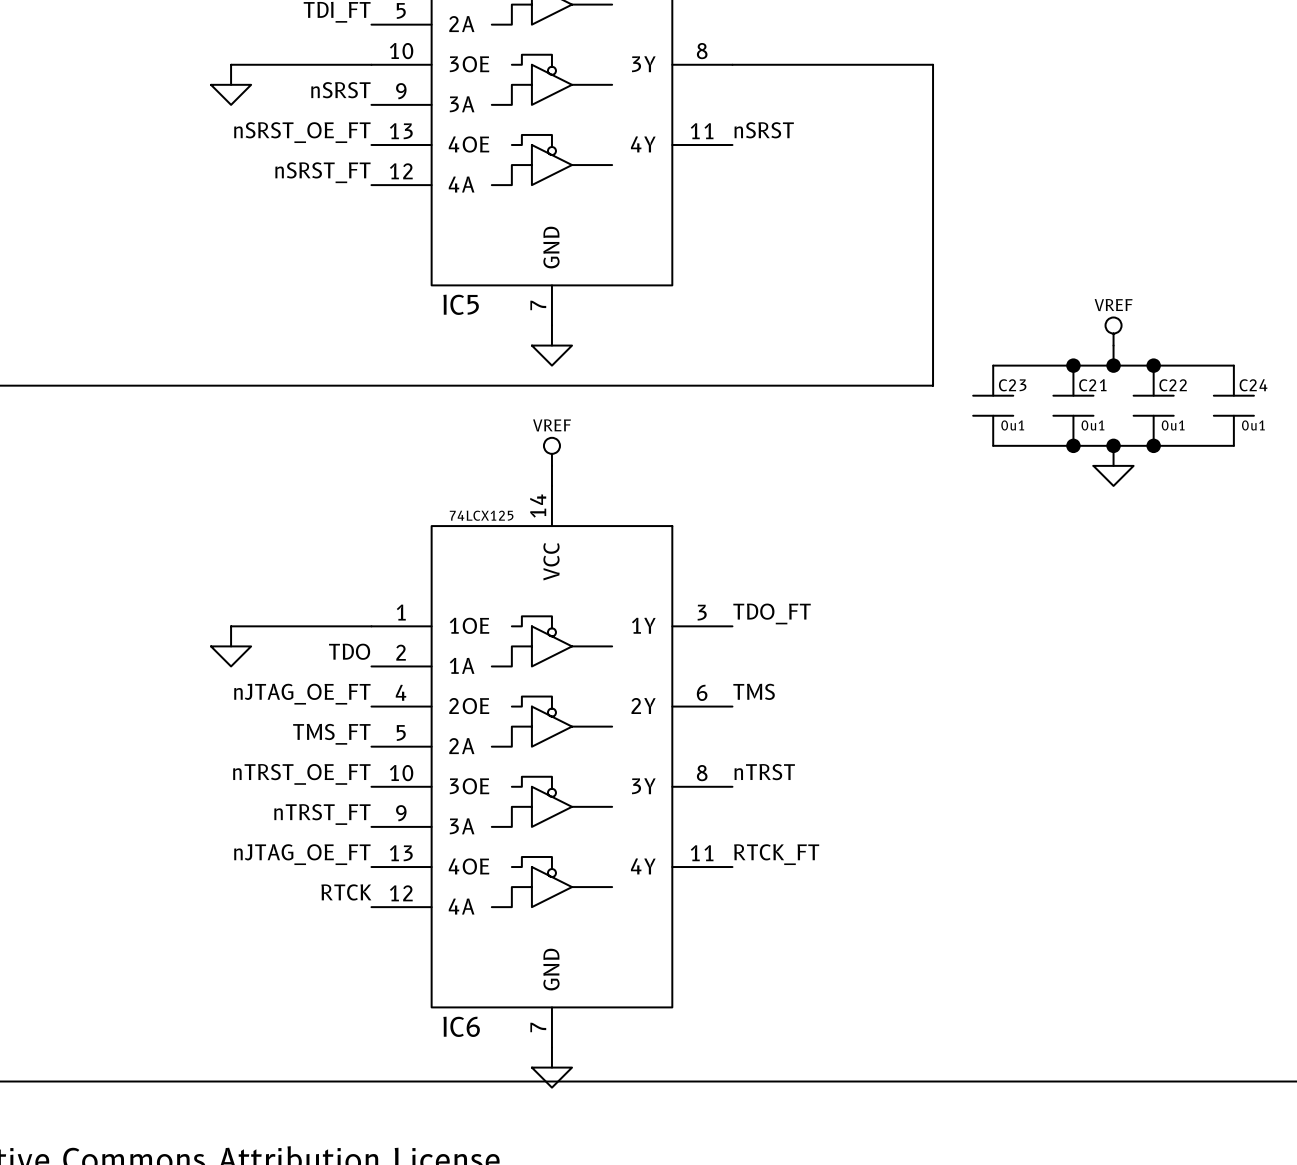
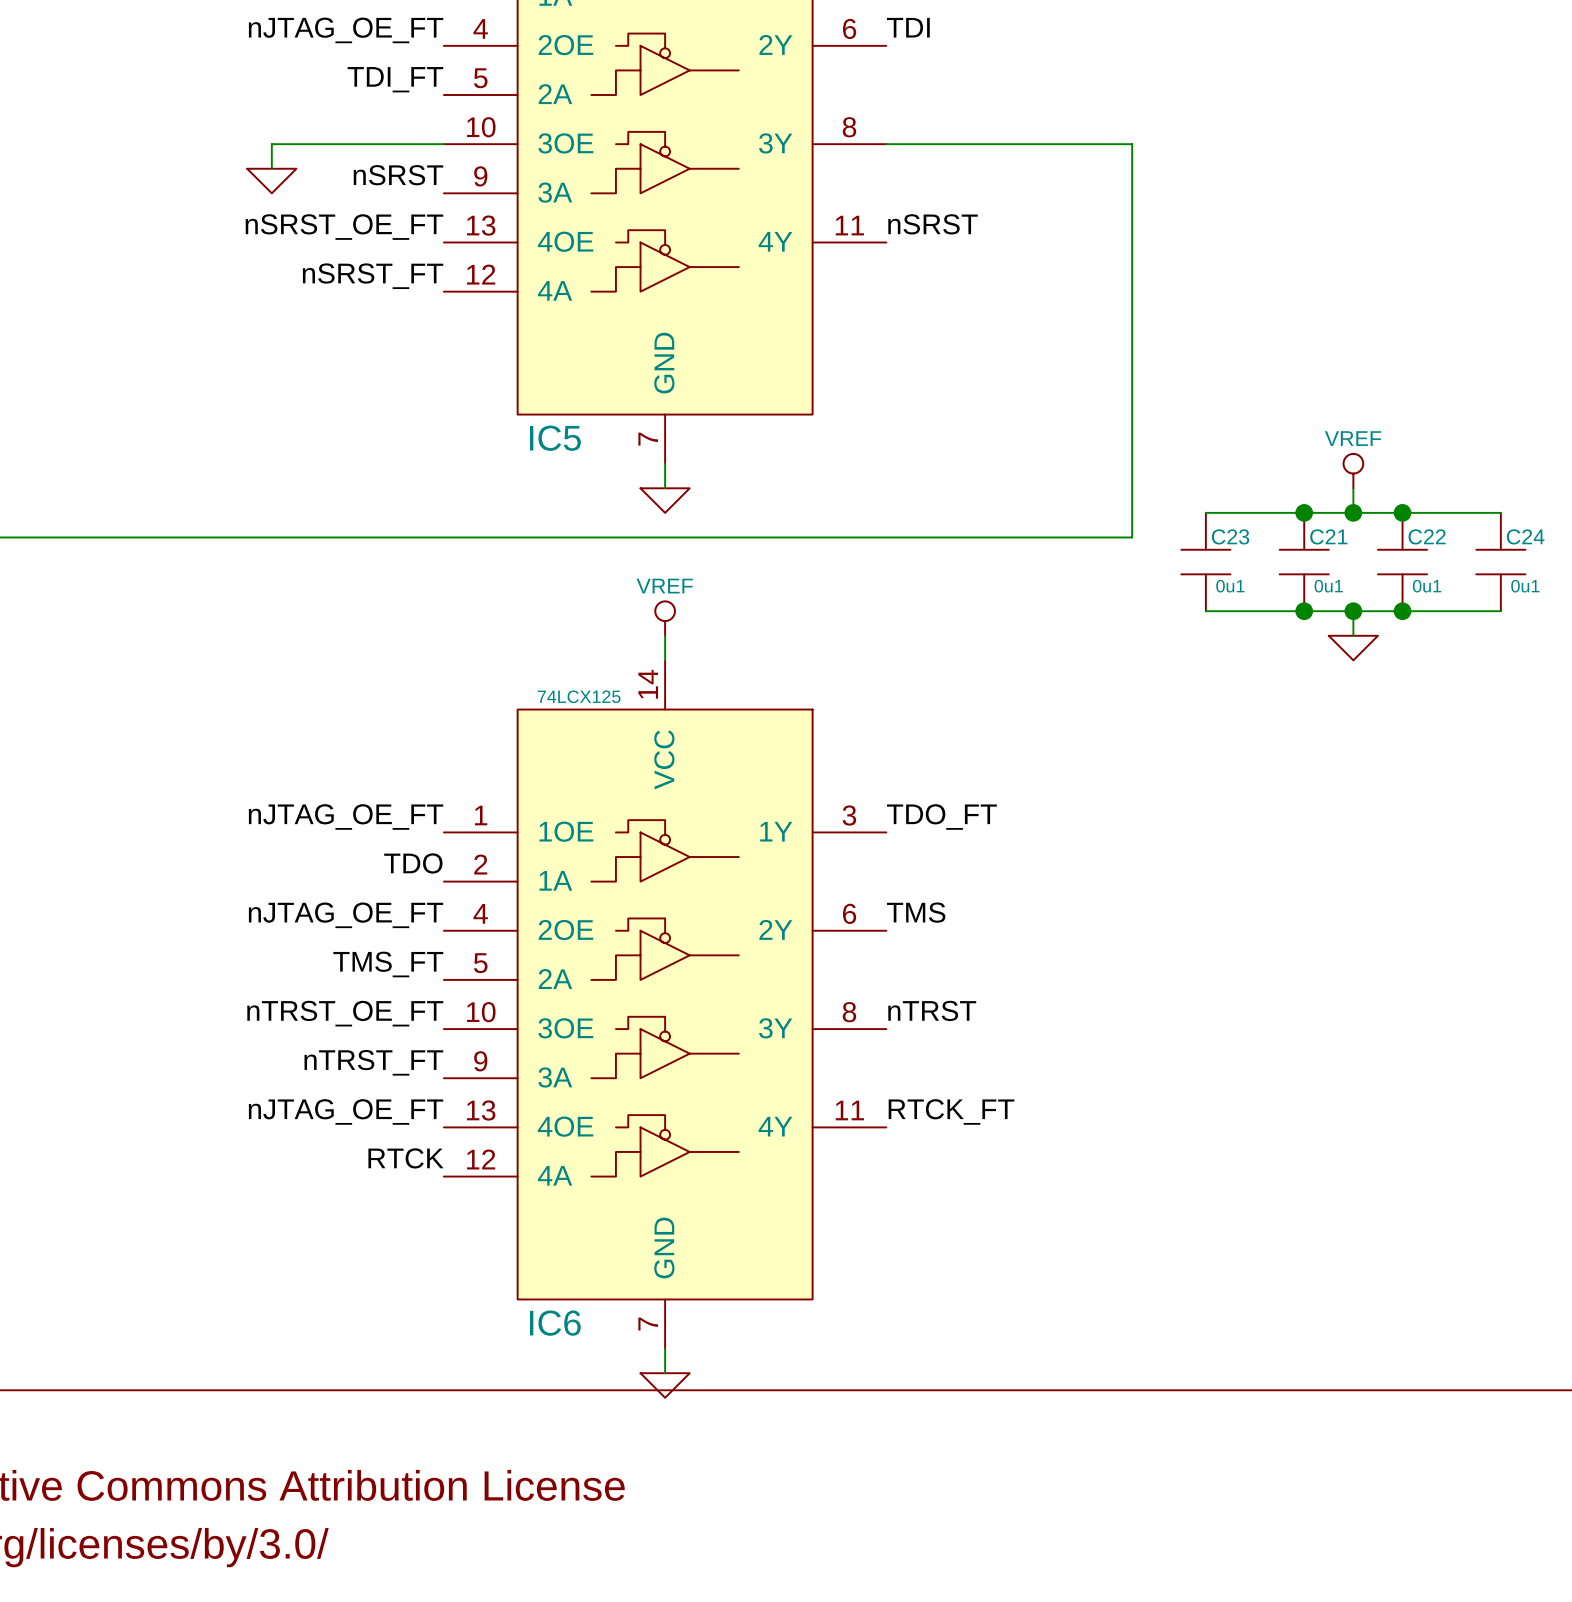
label: none -> nJTAG_OE_FT (346, 816)
wire: (371, 626) (231, 626) (231, 646) -> none
power symbol: (231, 656) -> none

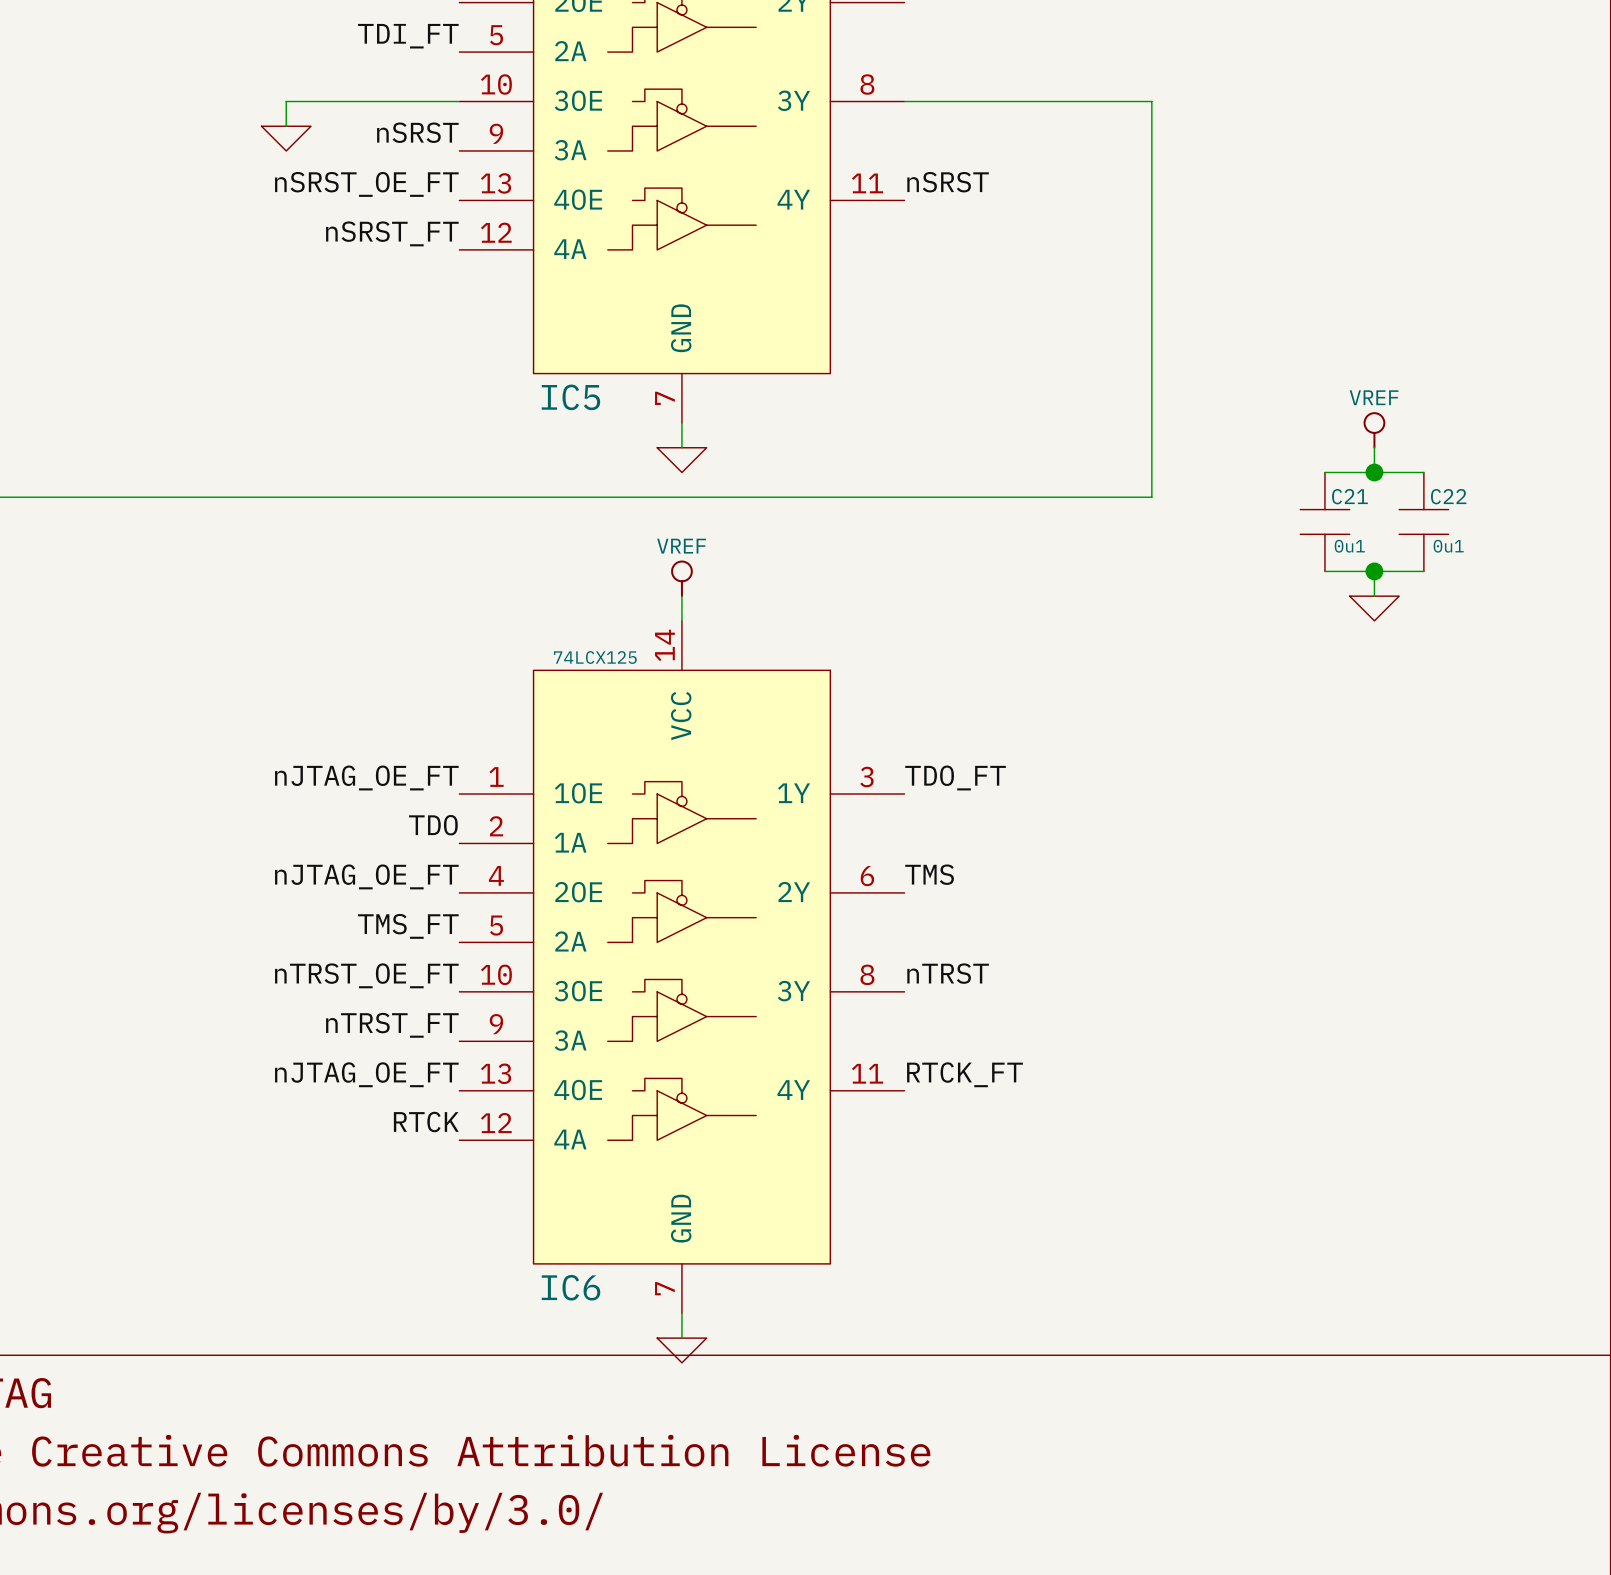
wire: (1205, 512) (1304, 512) -> none
junction: (1304, 512) -> none
wire: (1402, 512) (1500, 512) -> none
junction: (1402, 512) -> none
C23: 0u1 (1205, 562) -> none
C24: 0u1 (1500, 562) -> none
wire: (1205, 611) (1304, 611) -> none
junction: (1304, 611) -> none
wire: (1402, 611) (1500, 611) -> none
junction: (1402, 611) -> none

